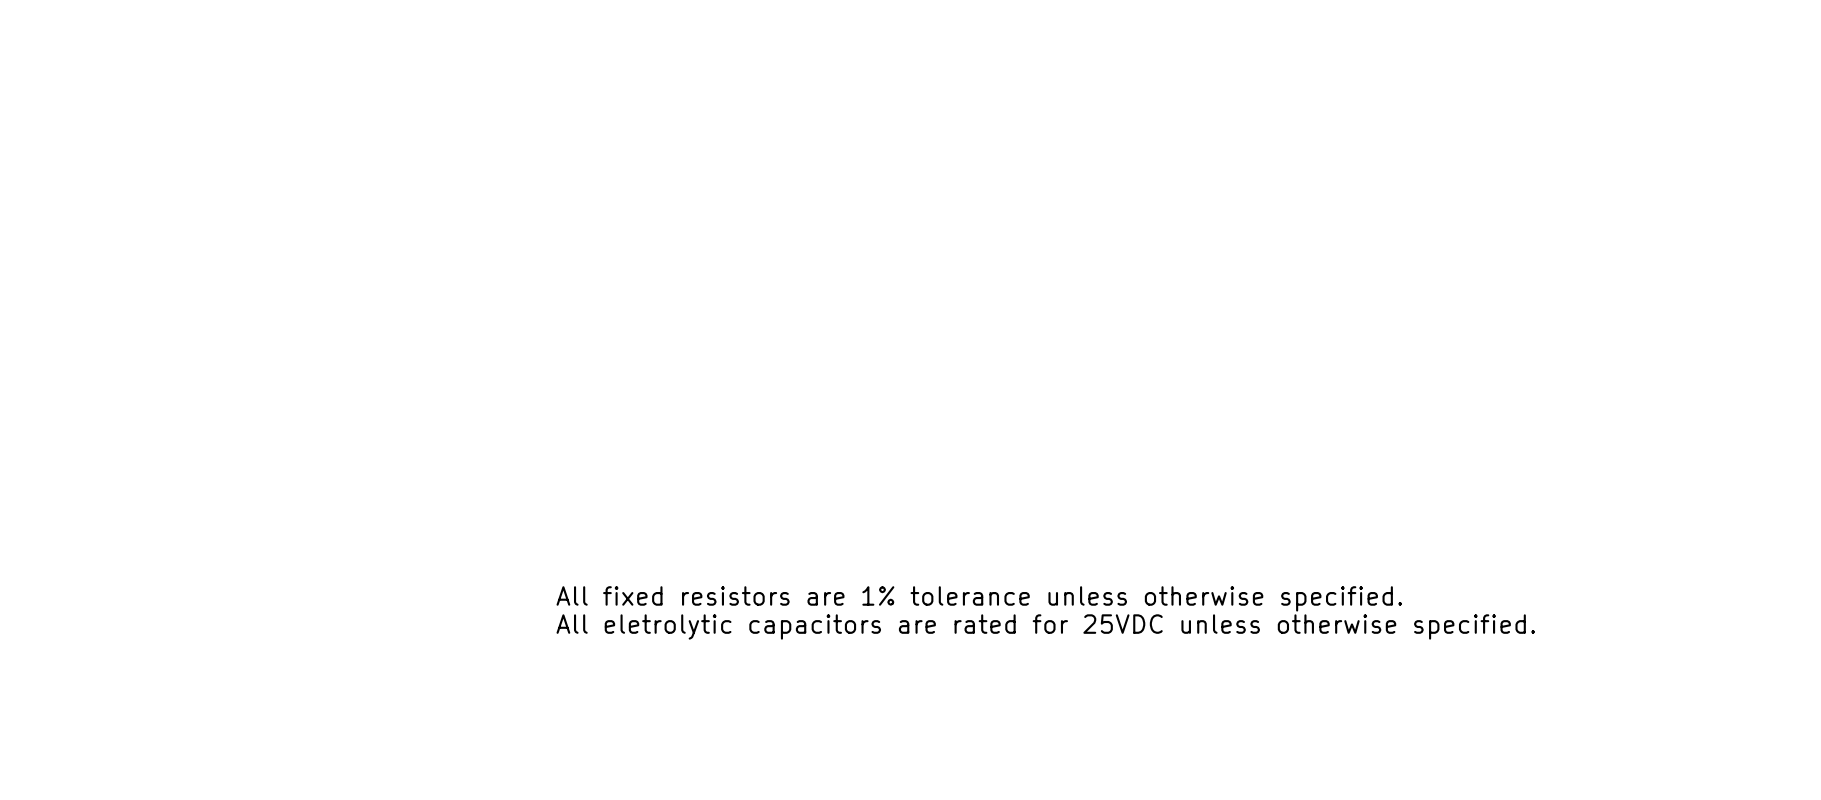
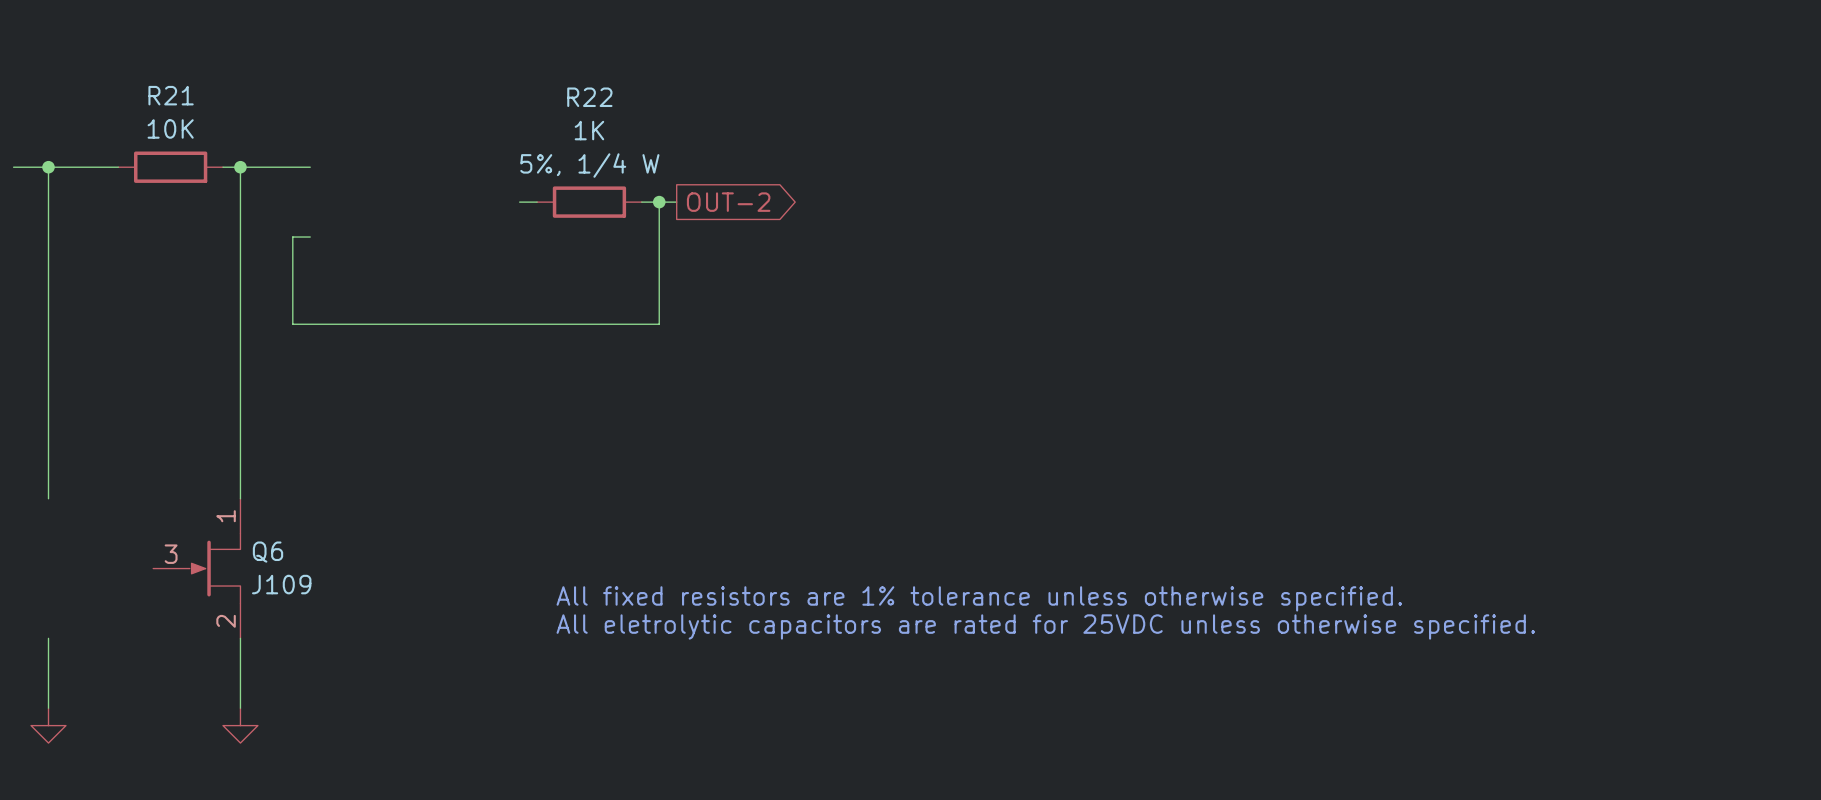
wire: none -> (13, 167) (118, 167)
wire: none -> (48, 167) (48, 498)
junction: none -> (48, 167)
R21: none -> 10K (170, 167)
wire: none -> (223, 167) (310, 167)
wire: none -> (240, 167) (240, 498)
junction: none -> (240, 167)
wire: none -> (519, 202) (537, 202)
R22: none -> 1K (589, 202)
wire: none -> (641, 202) (676, 202)
wire: none -> (659, 202) (659, 324) (292, 324) (292, 237) (310, 237)
junction: none -> (659, 202)
global label: none -> OUT-2 (728, 202)
Q6: none -> J109 (196, 568)
wire: none -> (48, 638) (48, 708)
wire: none -> (240, 638) (240, 708)
power symbol: none -> (48, 725)
power symbol: none -> (240, 725)

